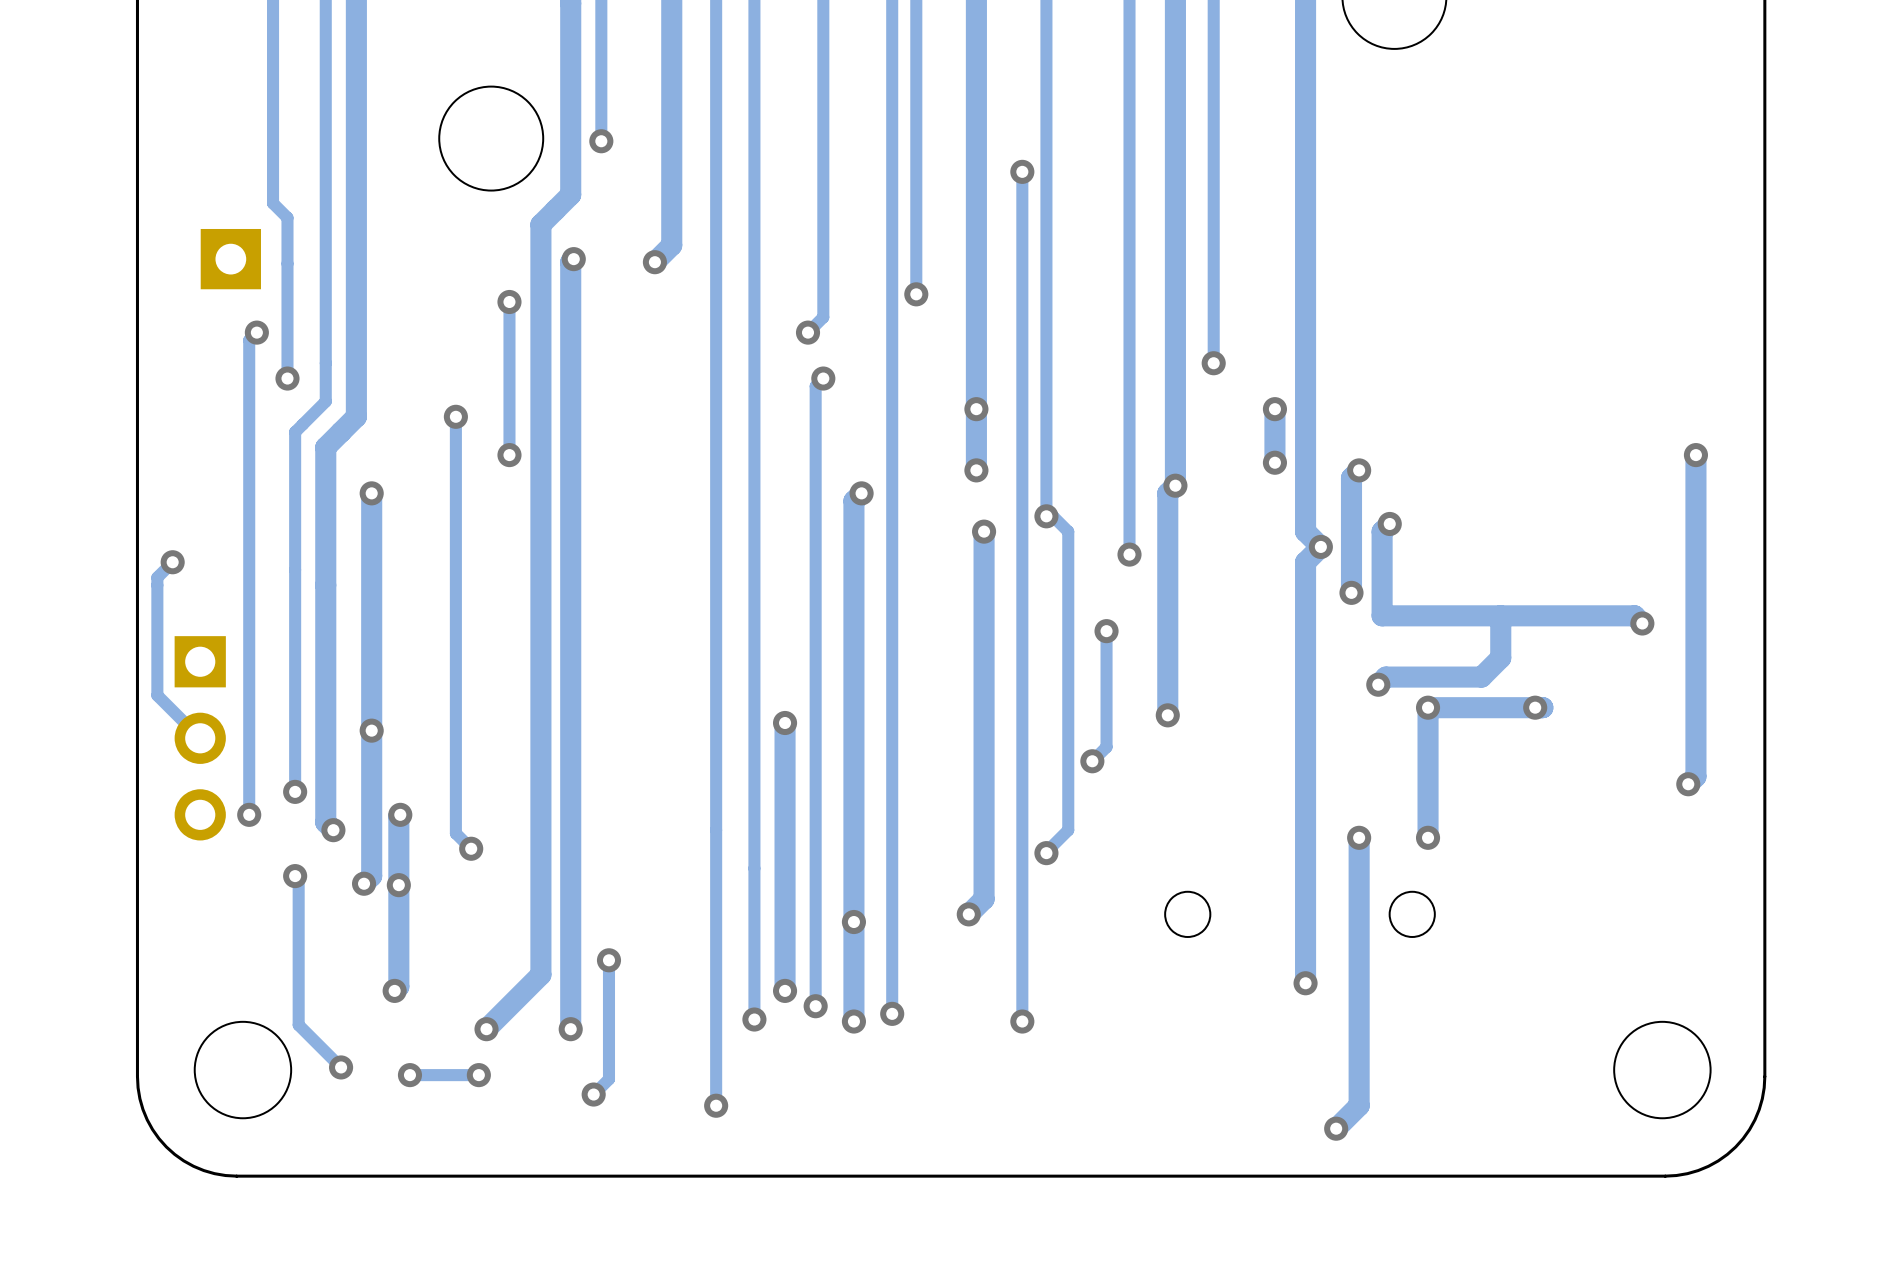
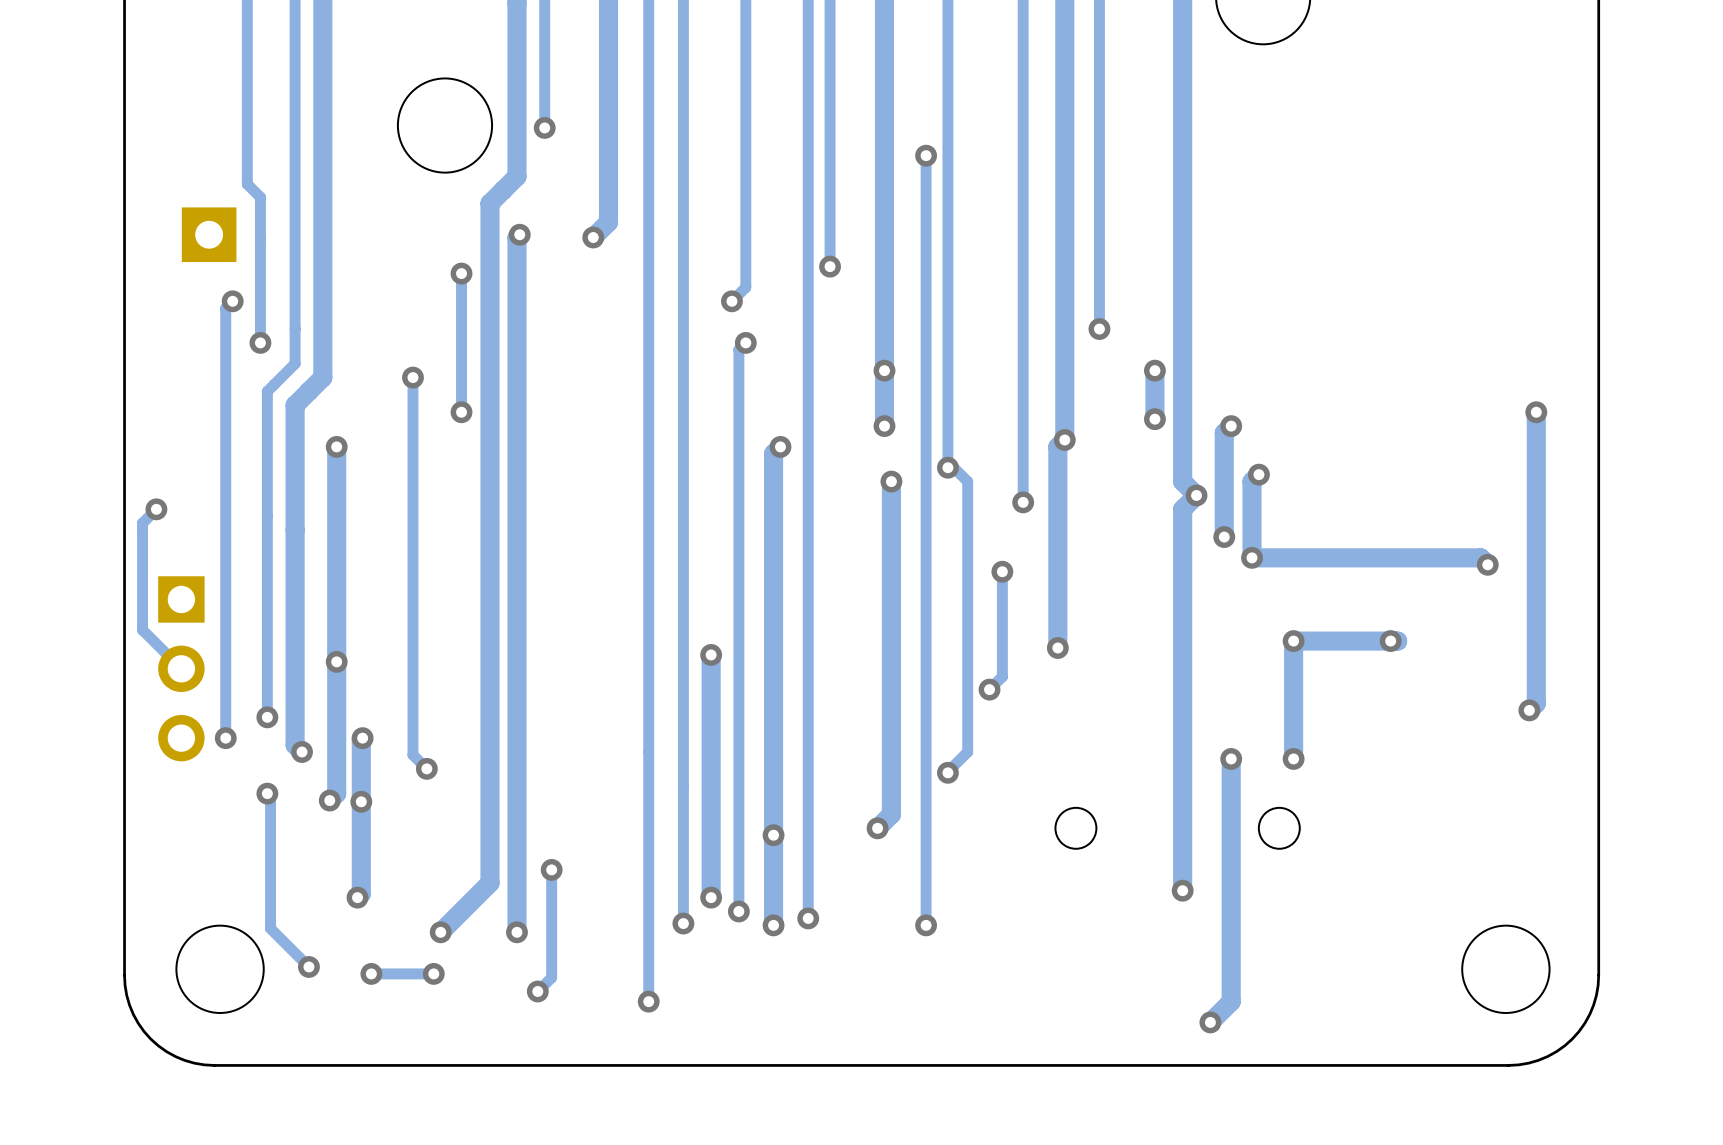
track: (1500, 615) (1500, 657) (1481, 677) (1385, 677) (1378, 684) -> none
via position: (1378, 684) -> (1252, 557)

